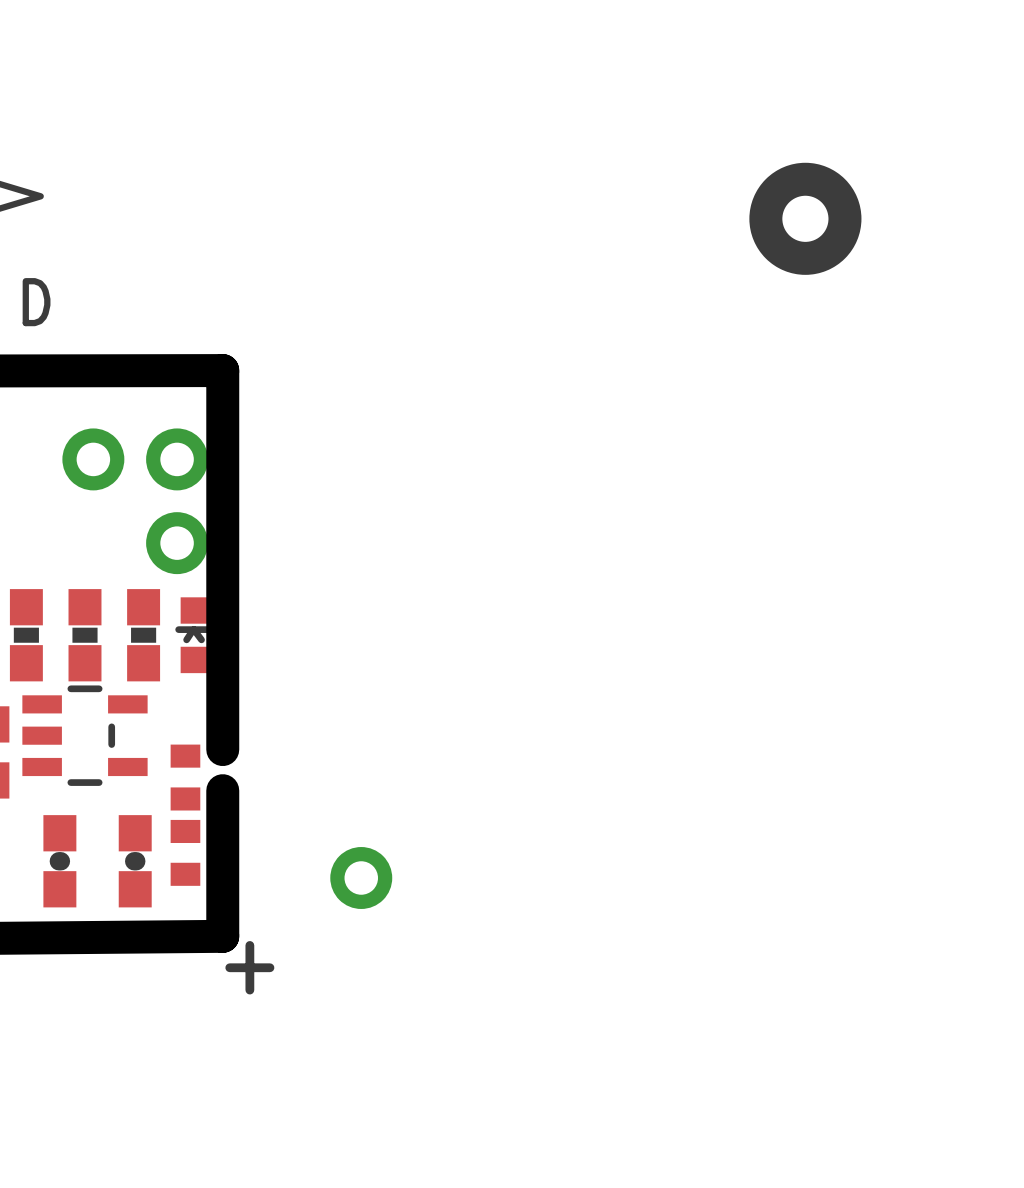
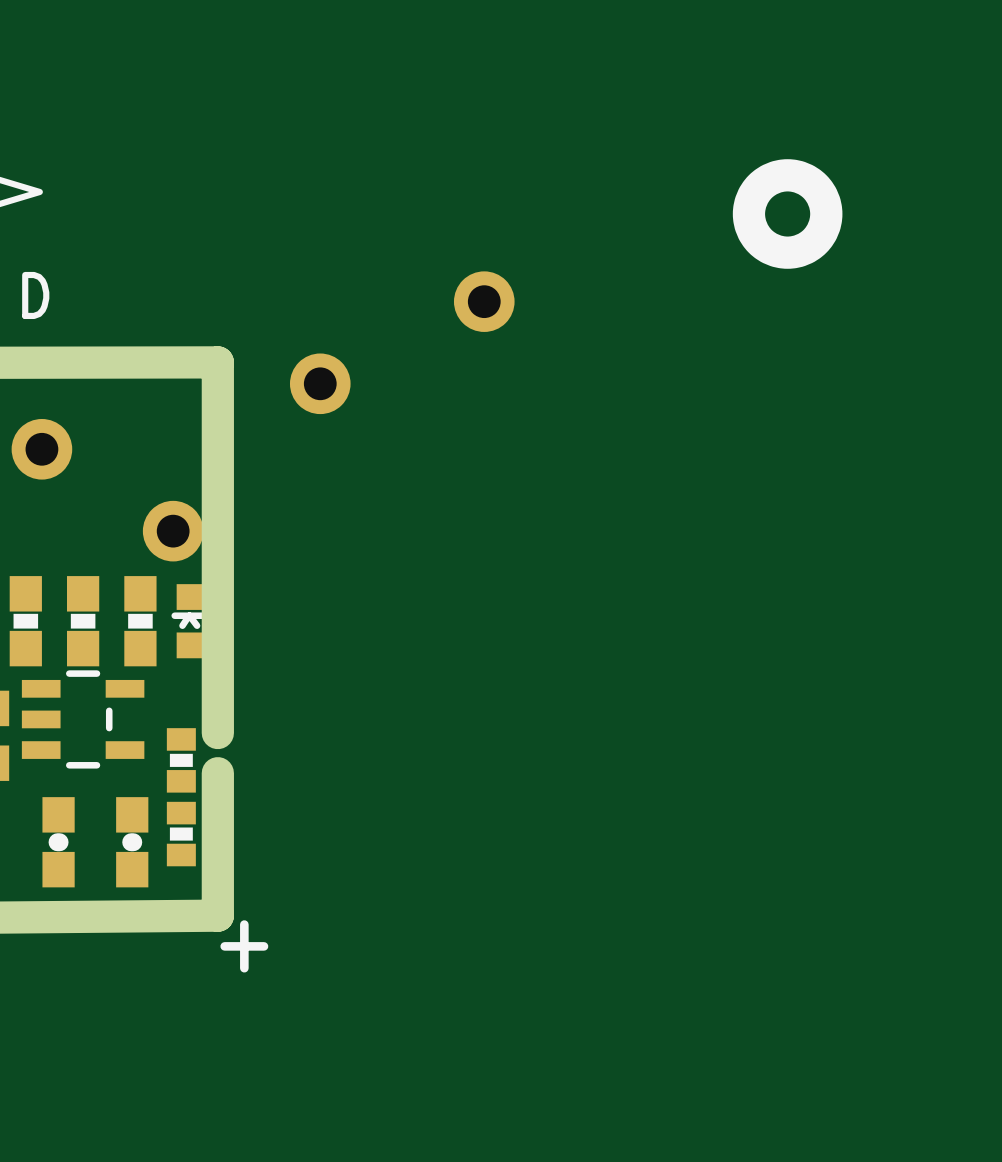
part: none -> (484, 301)
part: none -> (320, 383)
part position: (93, 459) -> (41, 449)
part: (177, 459) -> none
part footprint: [170, 744, 201, 811] -> [166, 728, 196, 793]
part footprint: [170, 819, 201, 886] -> [166, 801, 196, 867]
part: (361, 878) -> none

